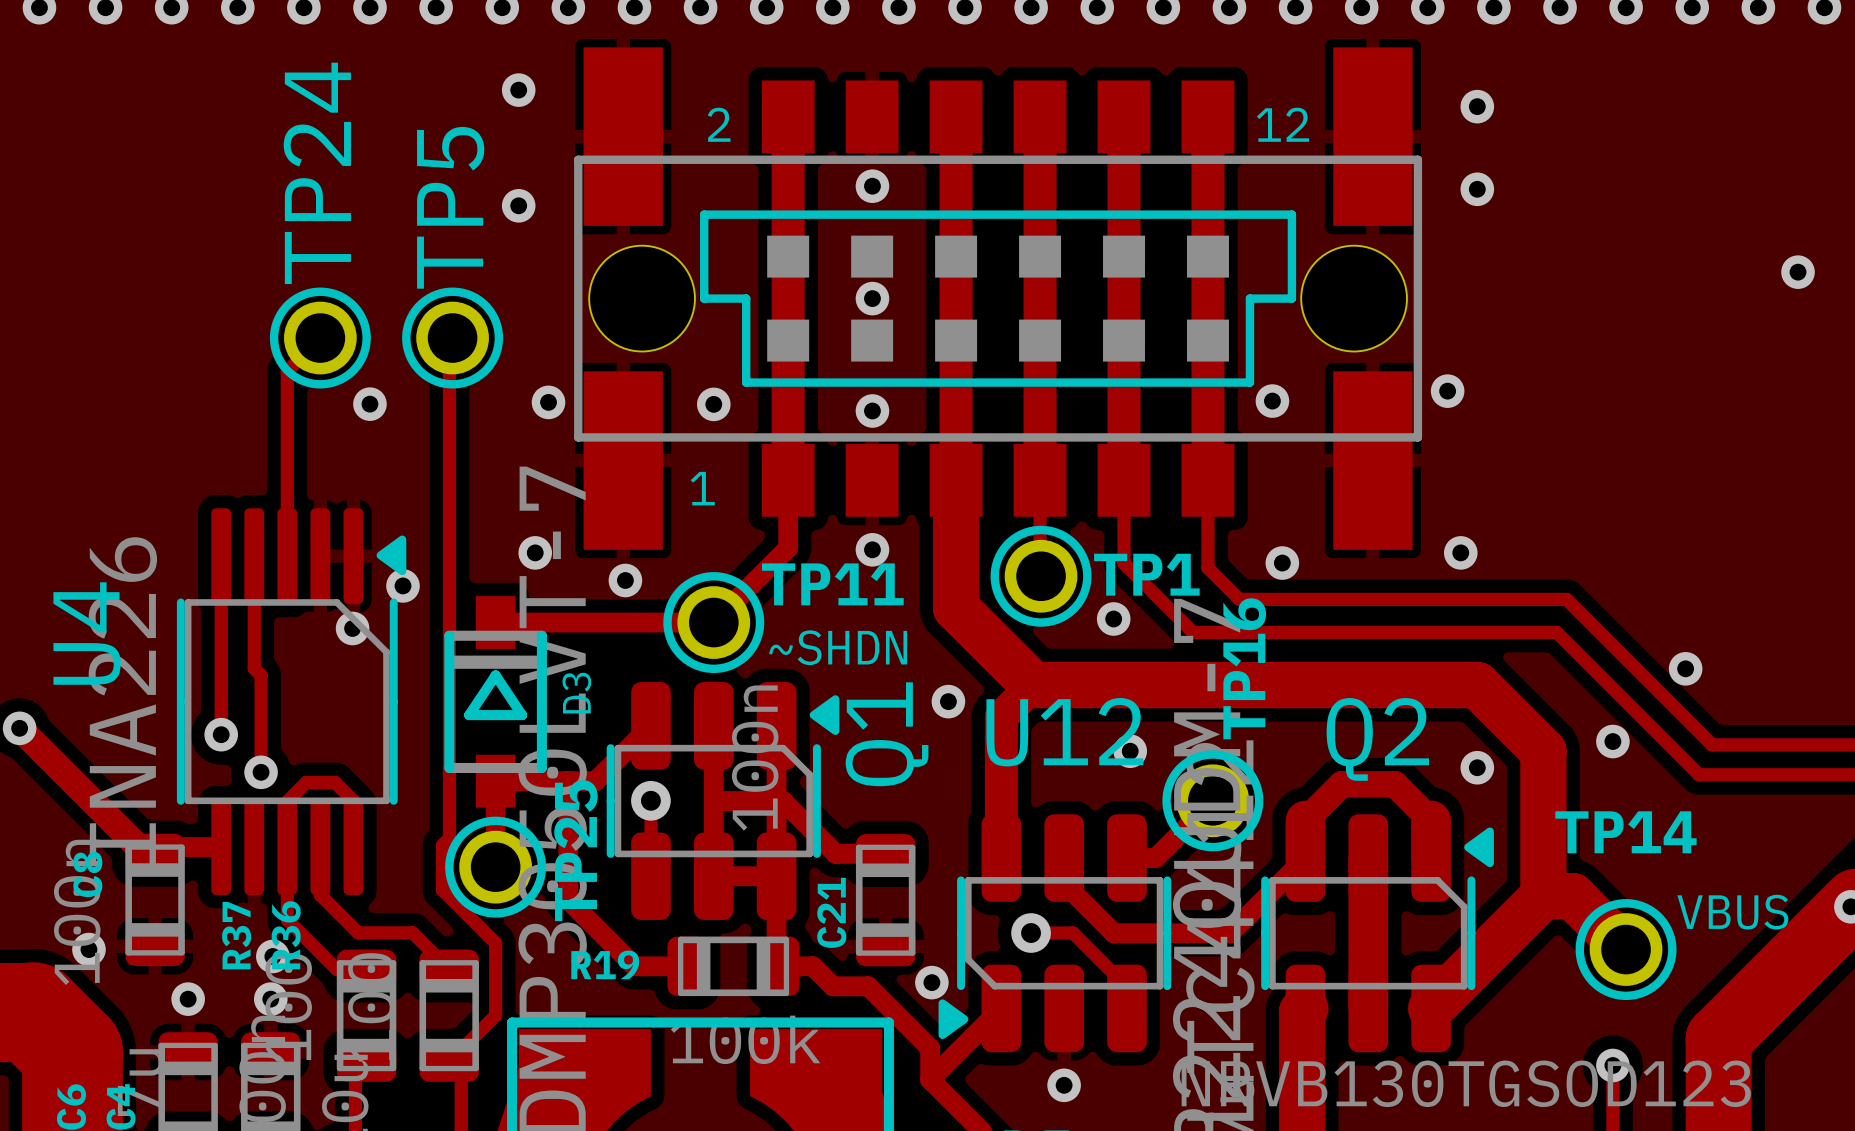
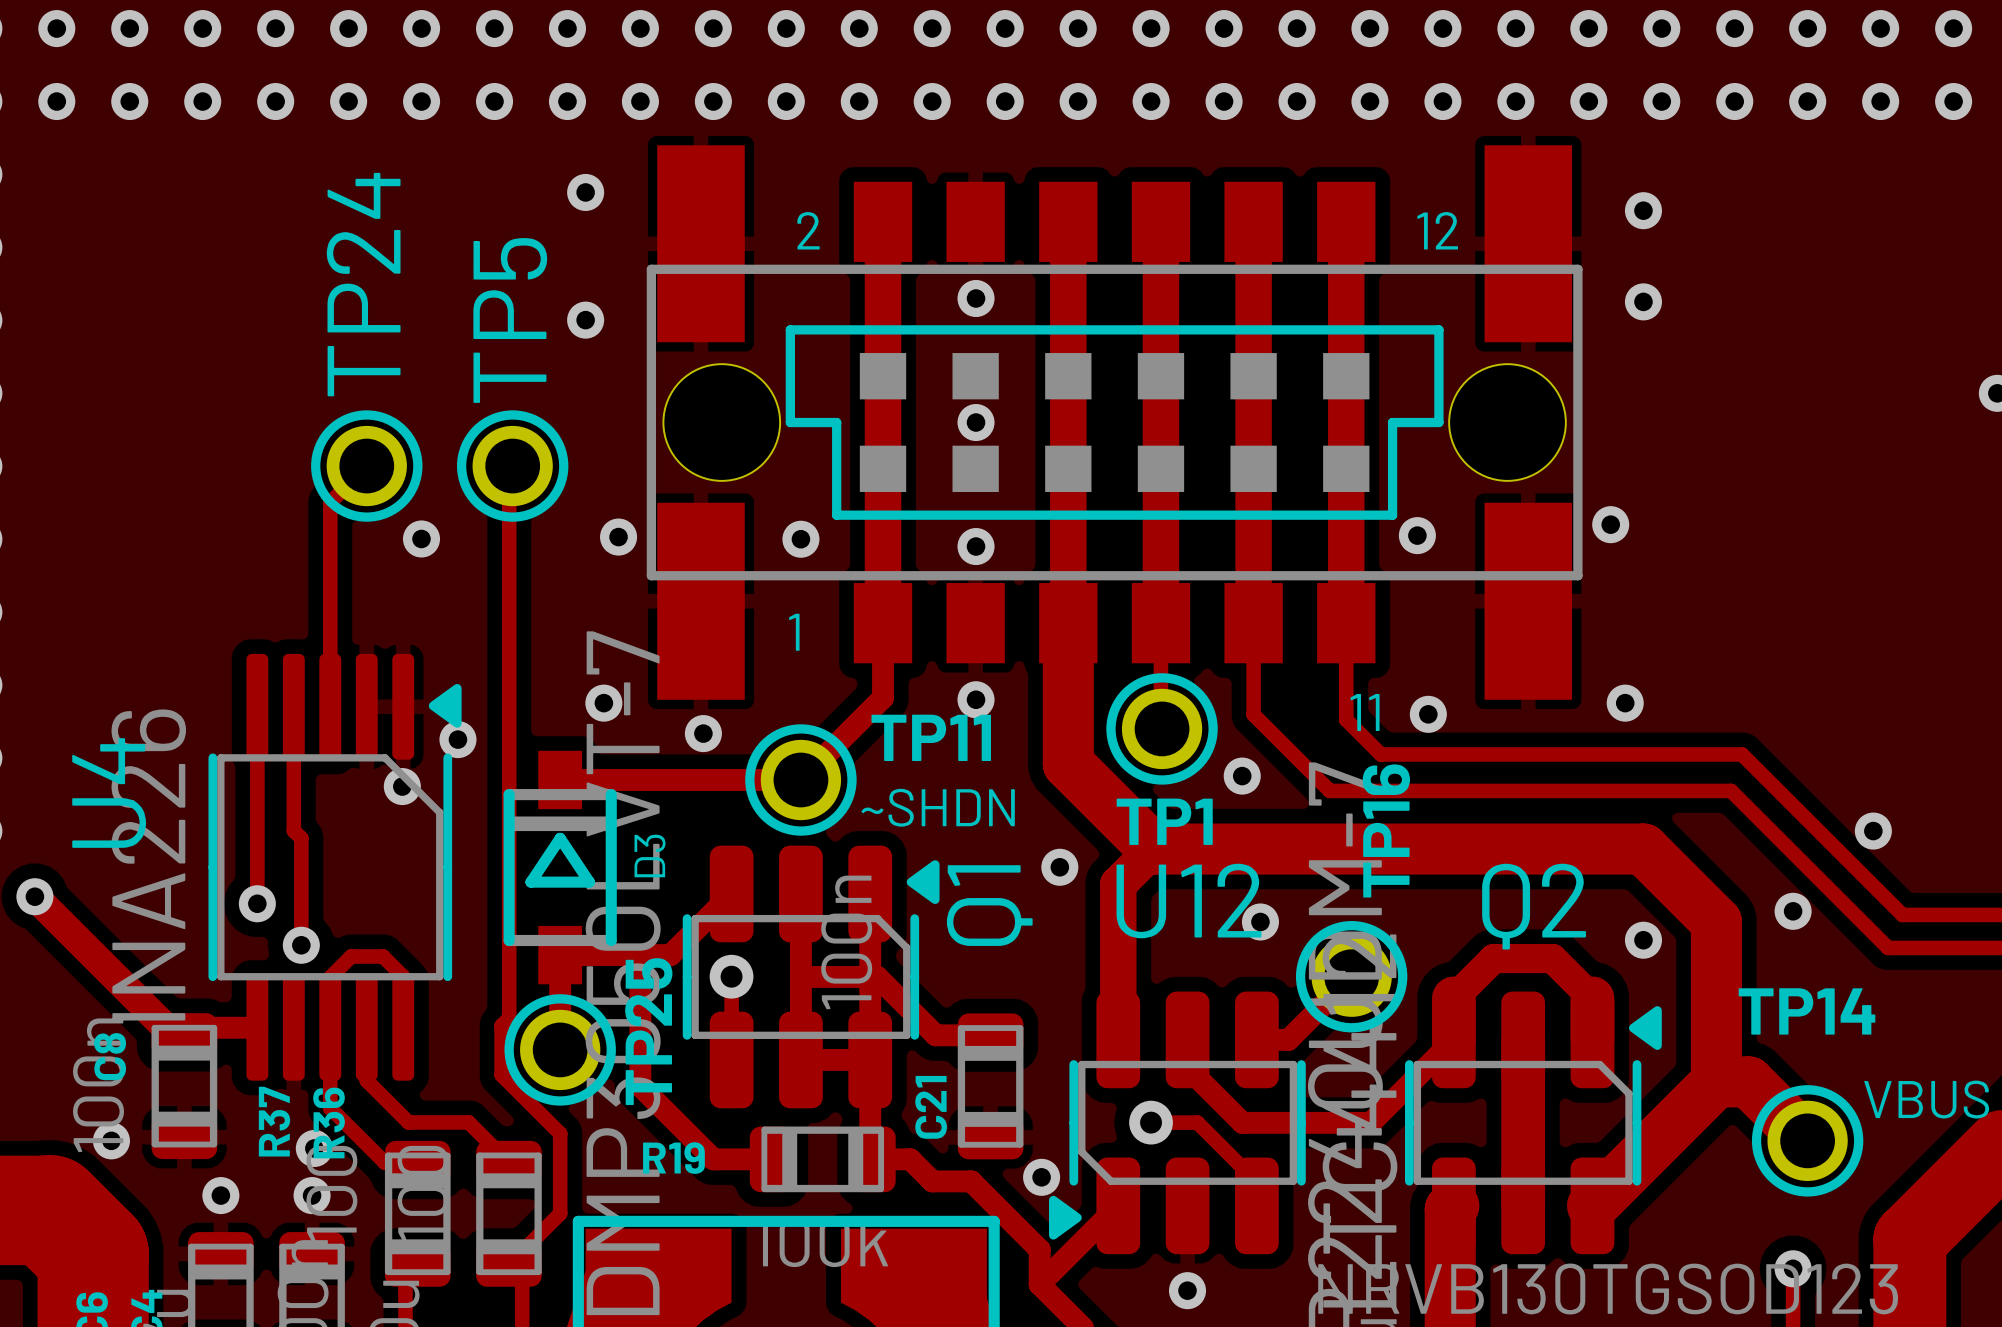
part text: none -> 11 (1365, 712)
TP1 name position: TP1 (1146, 574) -> TP1 (1164, 821)

